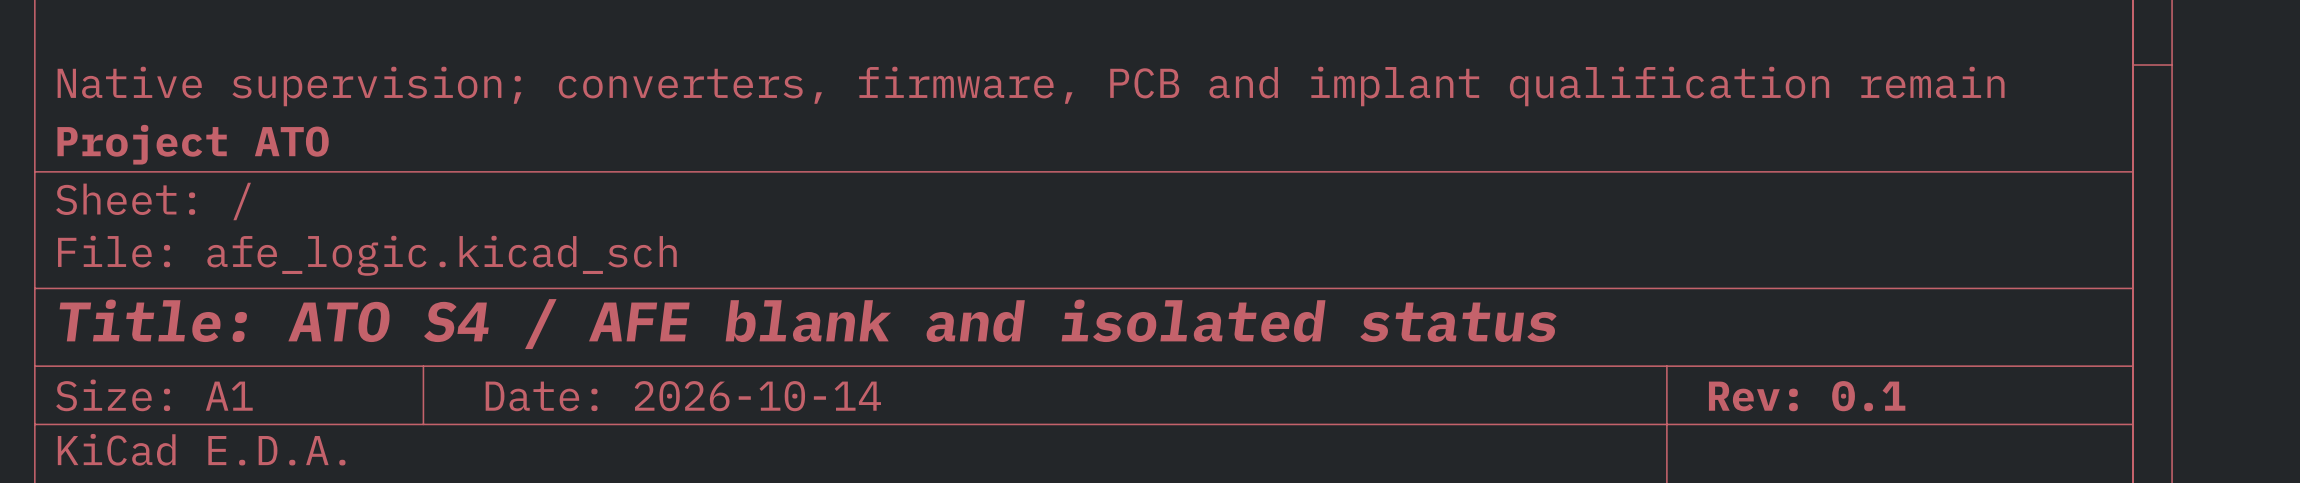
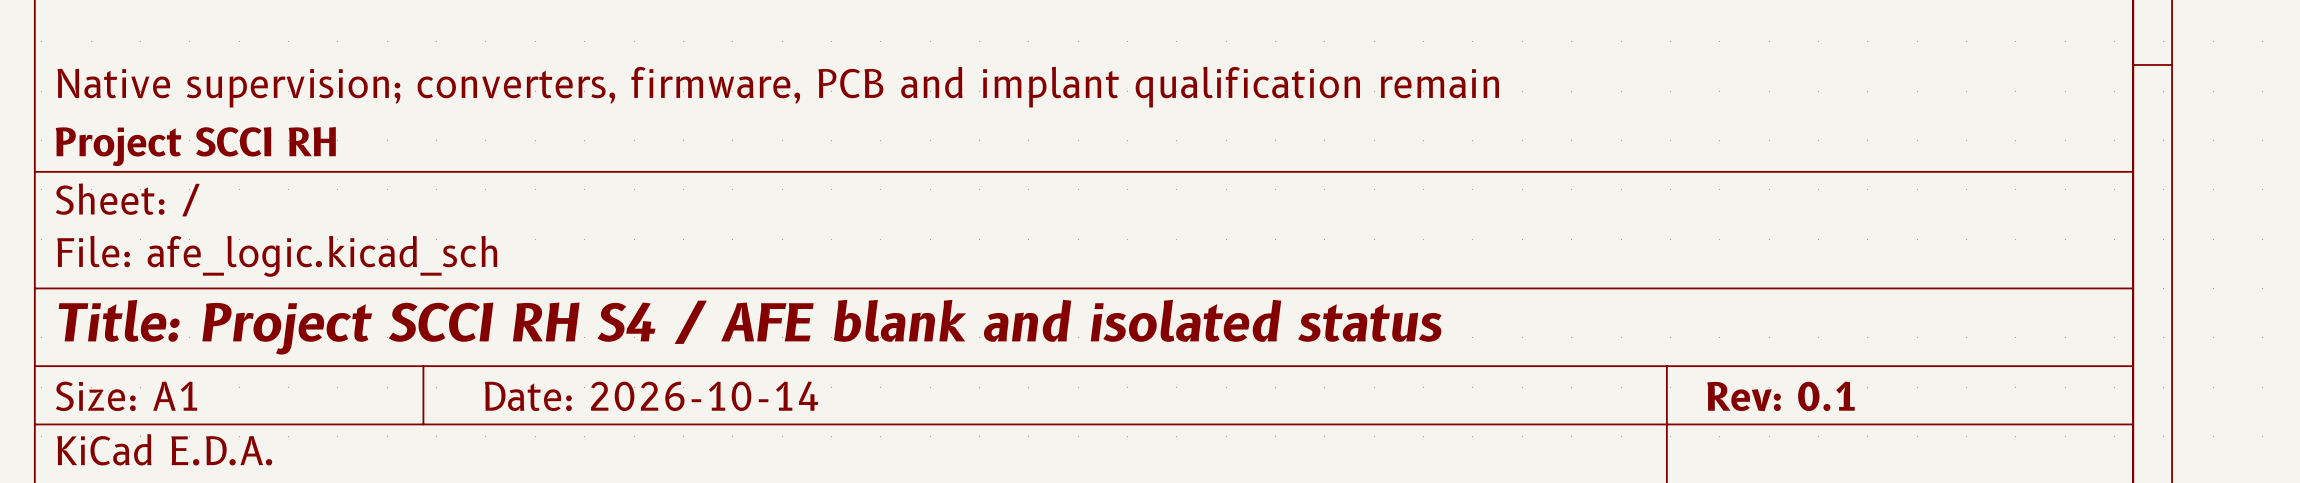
title block: Project ATO (193, 144) -> Project SCCI RH (195, 146)
title block: Title: ATO S4 / AFE blank and isolated status (808, 324) -> Title: Project SCCI RH S4 / AFE blank and isolated status (750, 327)

